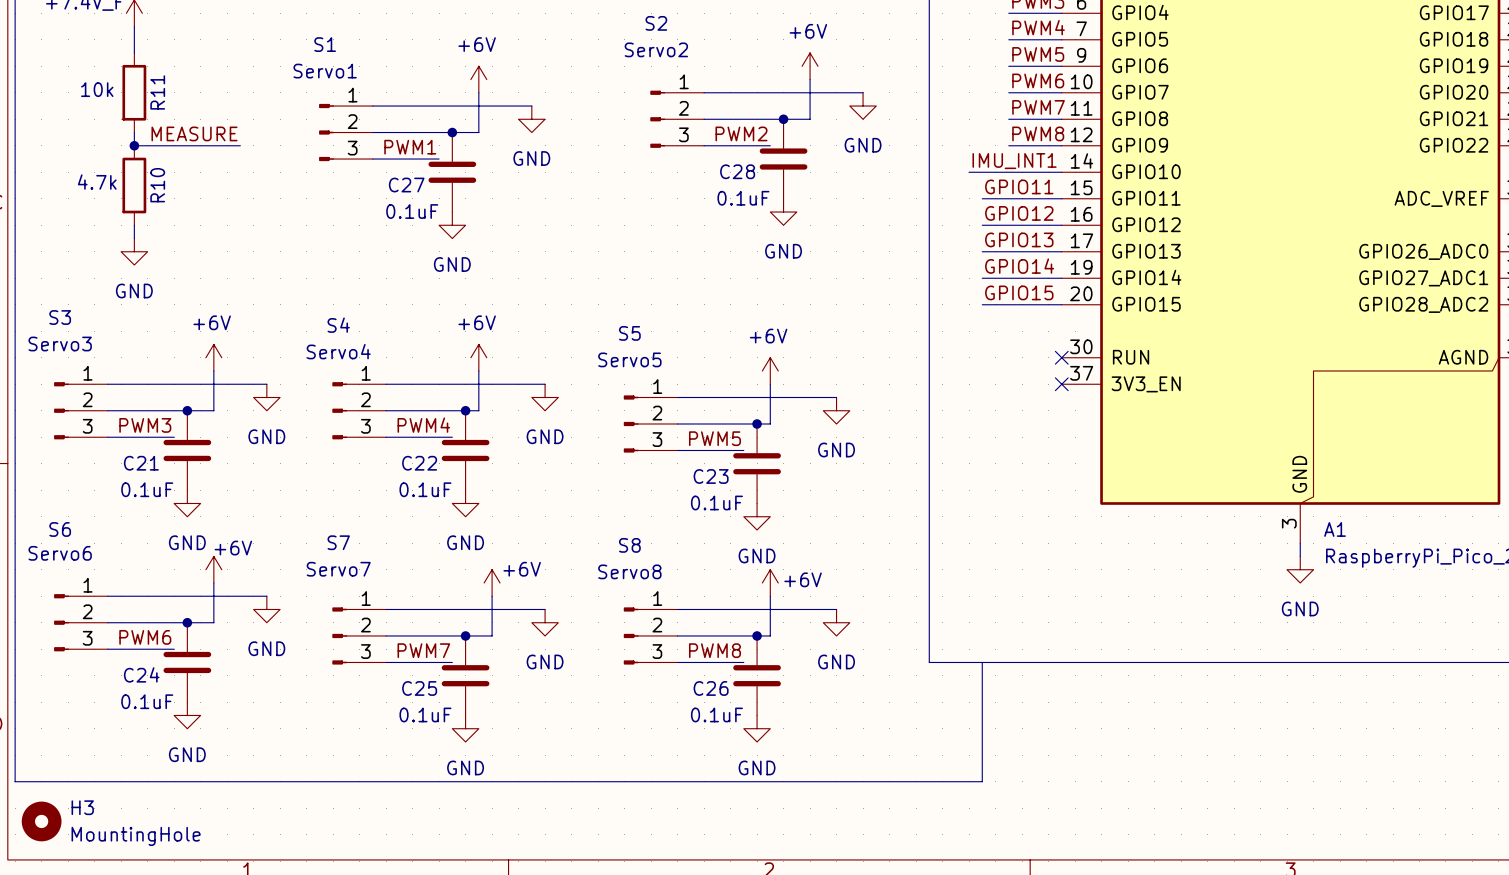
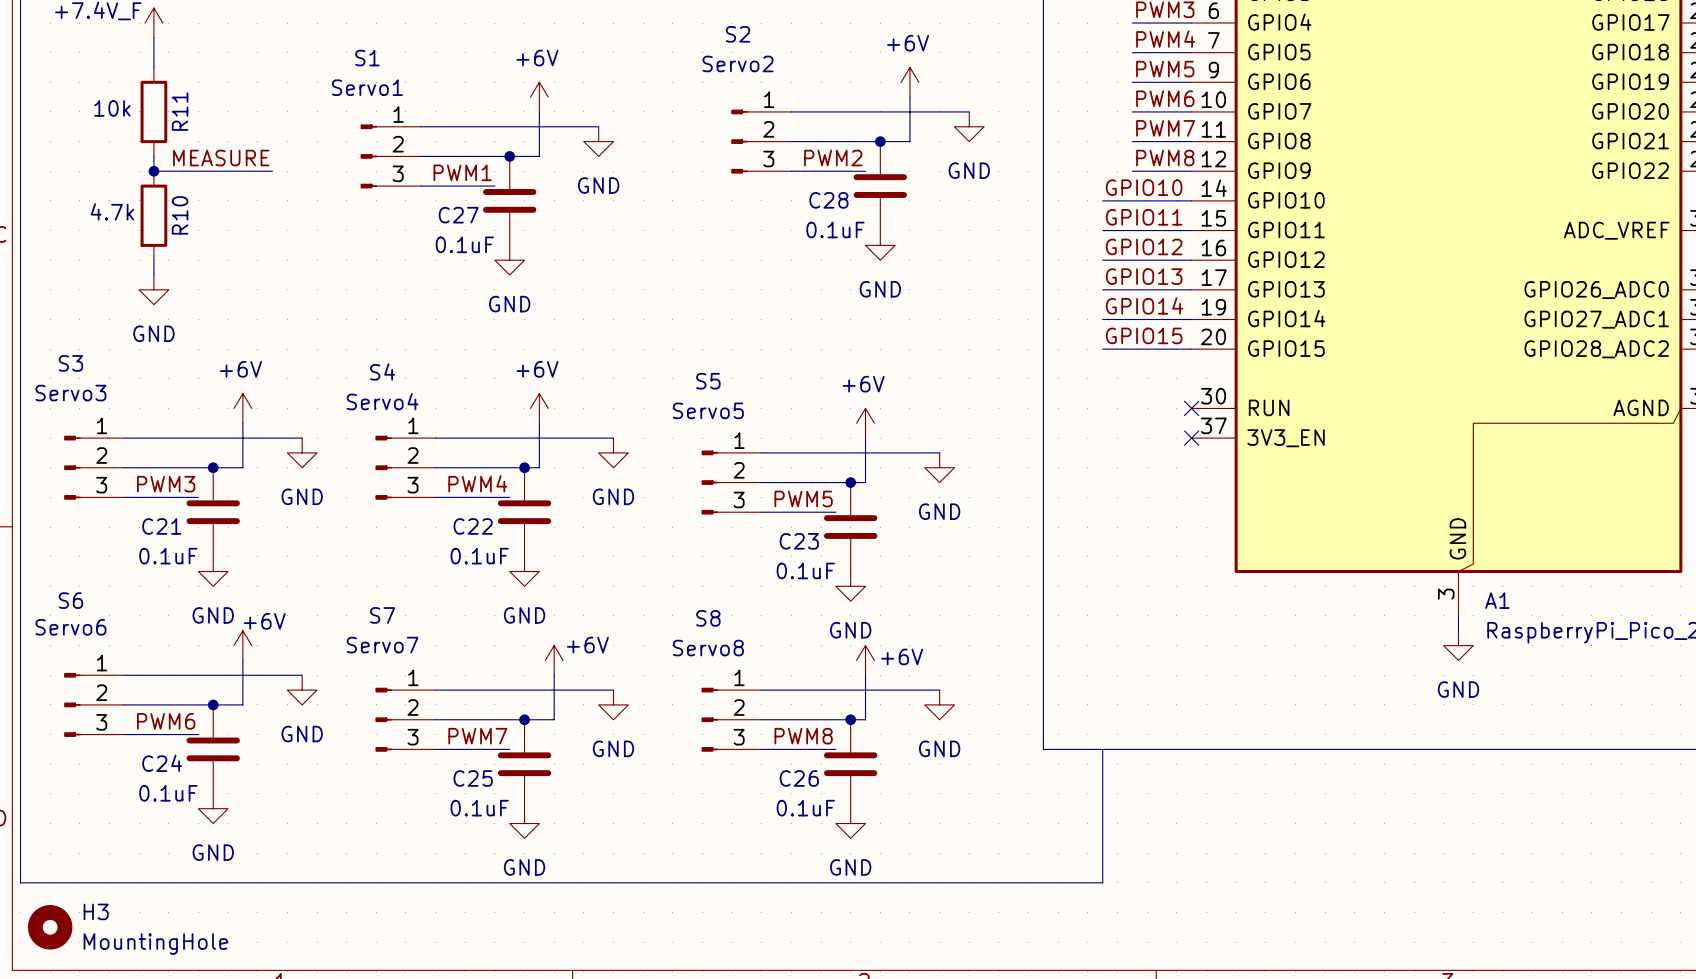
label: none -> GPIO10 (1144, 187)
label: IMU_INT1 (1014, 161) -> none
wire: (969, 172) (982, 172) -> none

